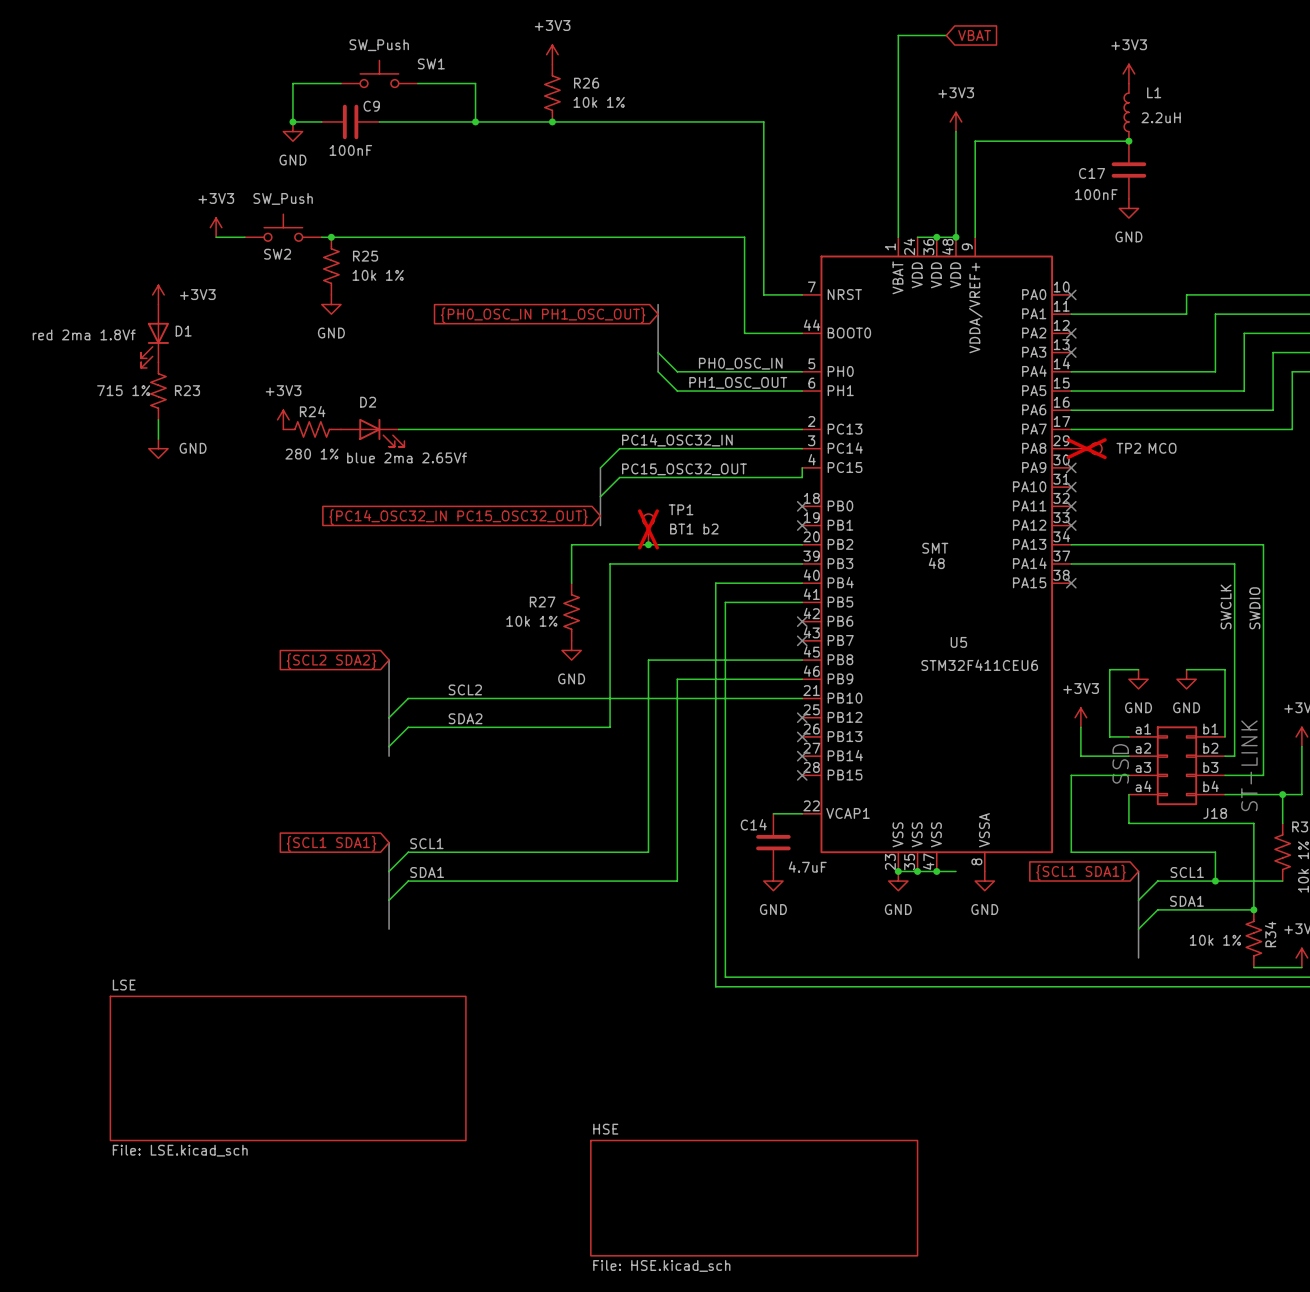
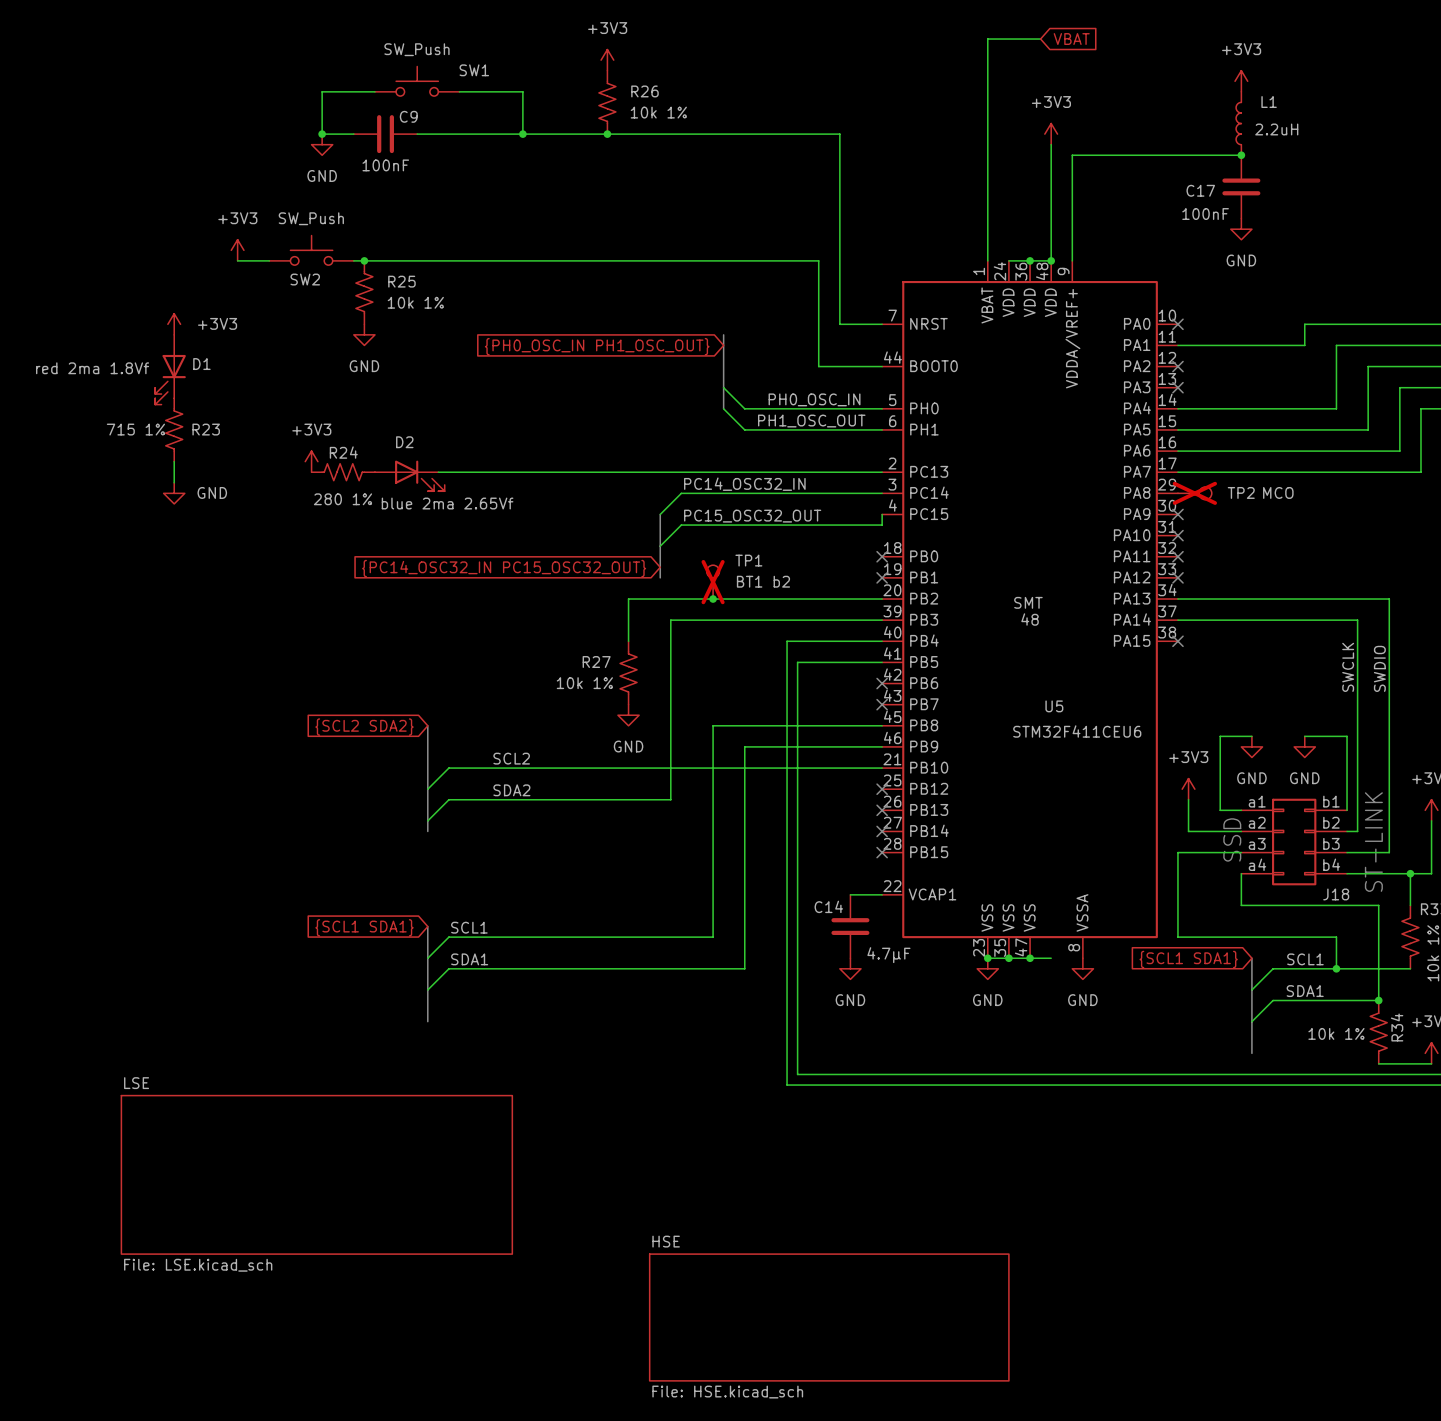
C14 value: 4.7uF (807, 867) -> 4.7µF (888, 955)

